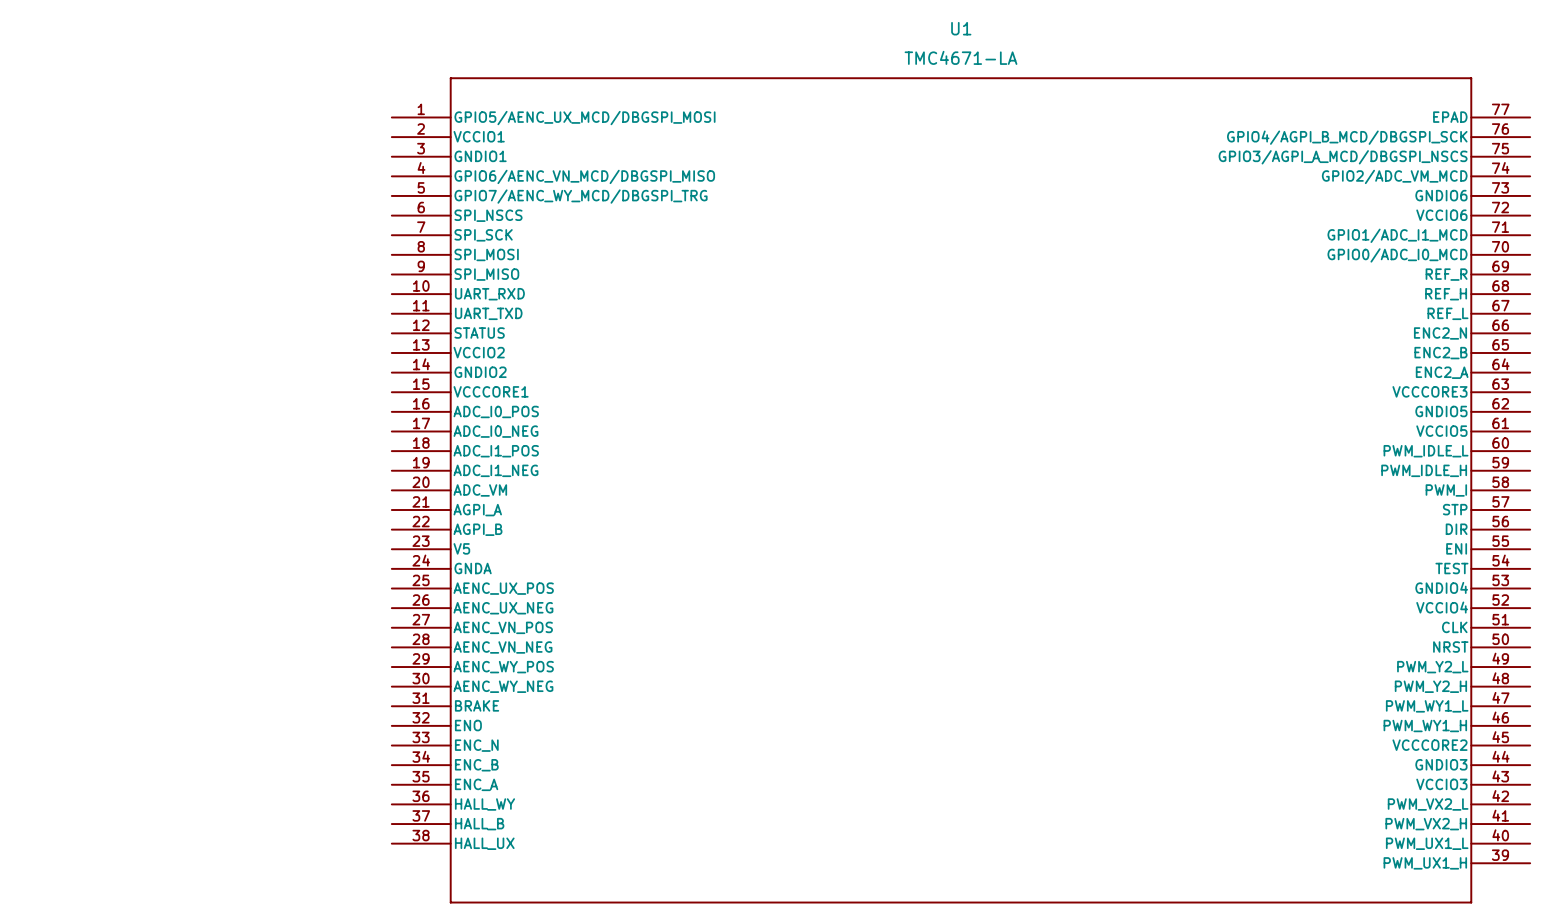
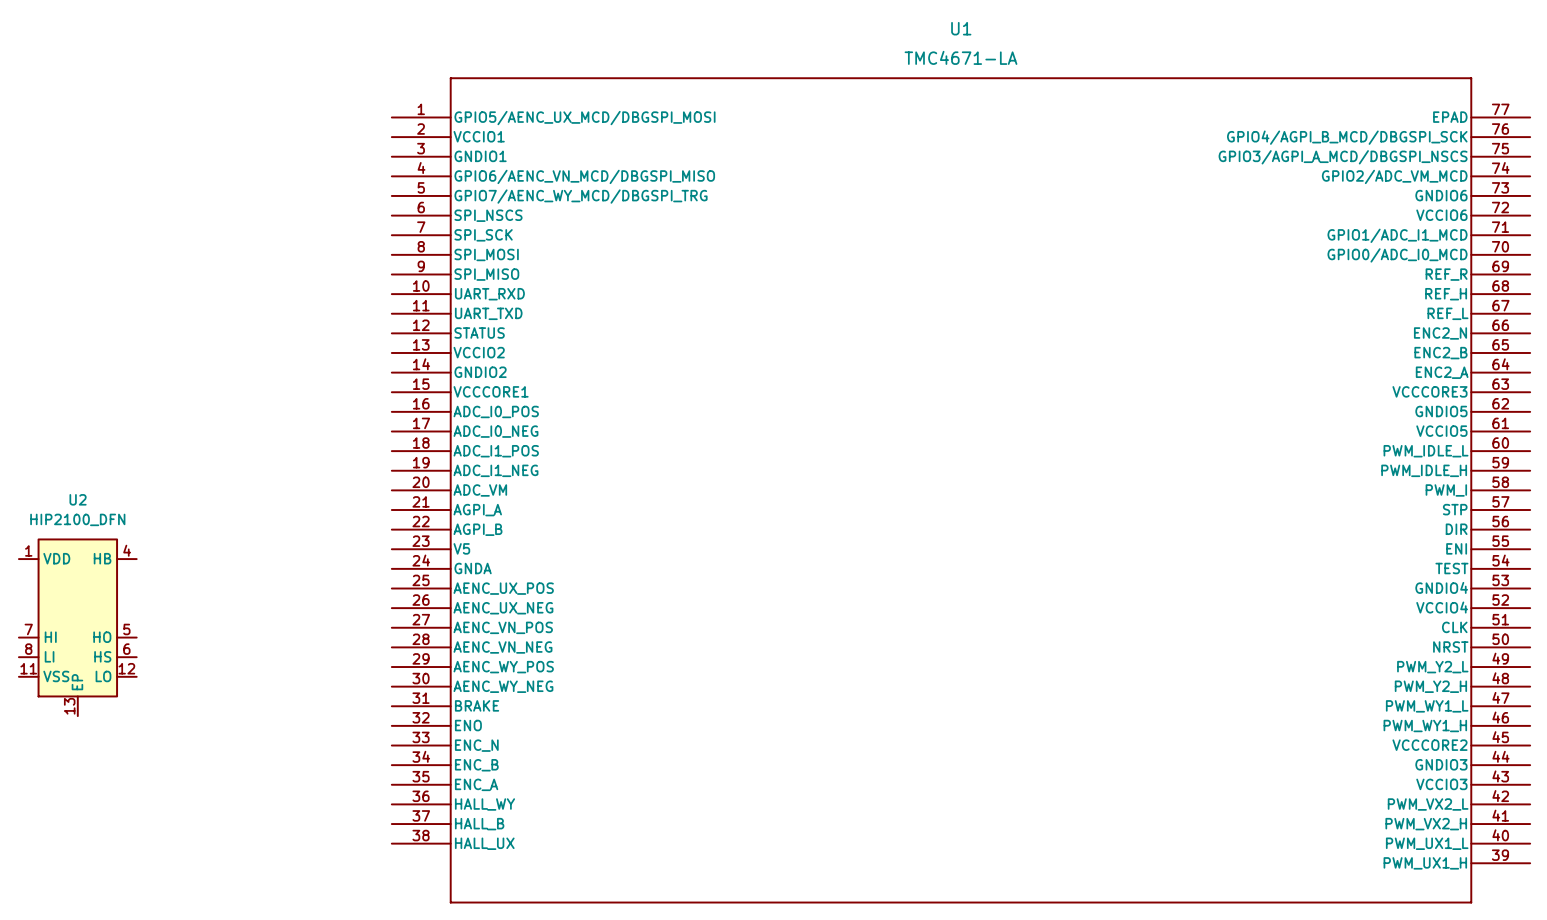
U2: none -> HIP2100_DFN (77, 627)

